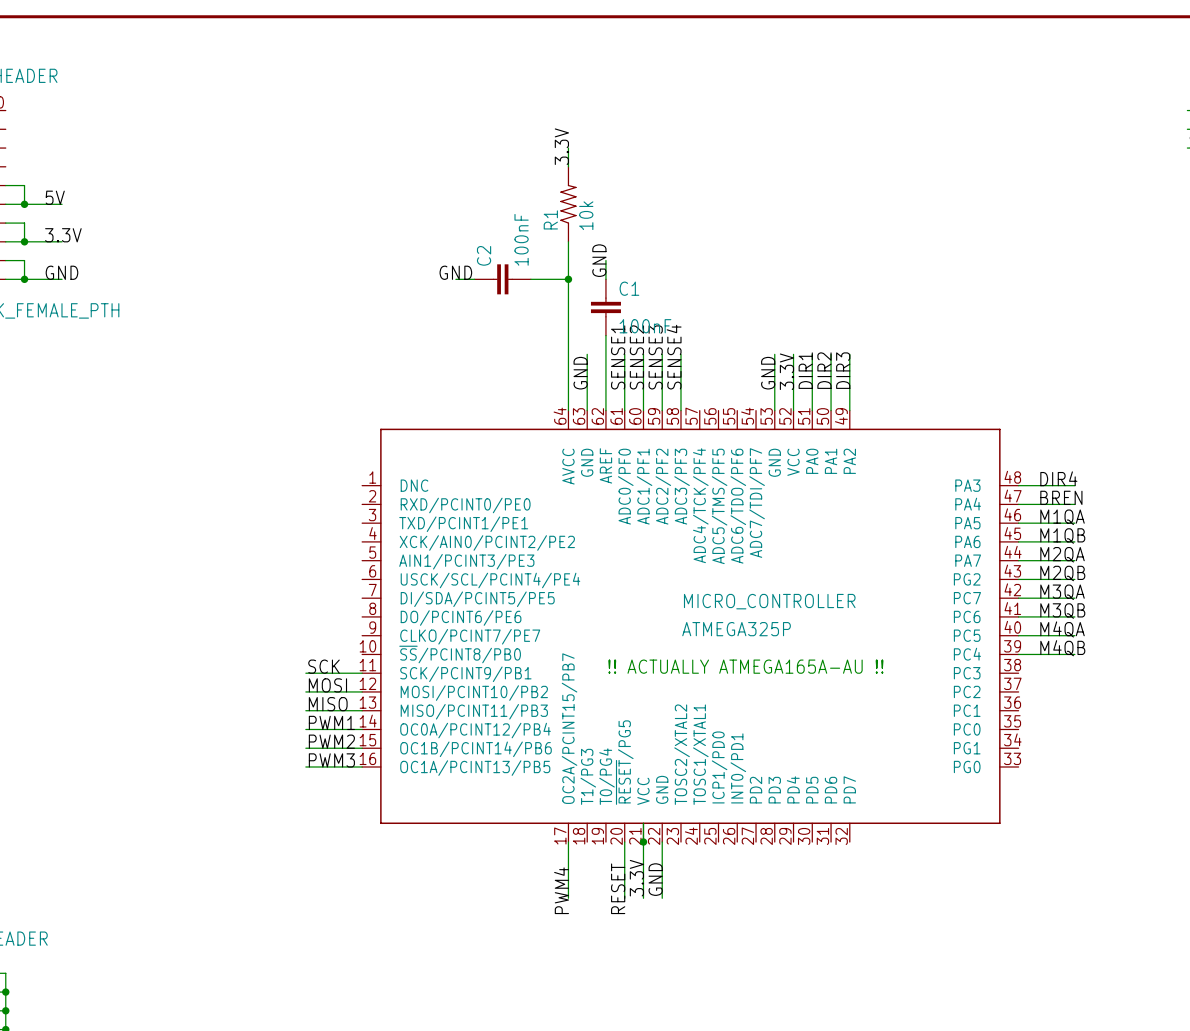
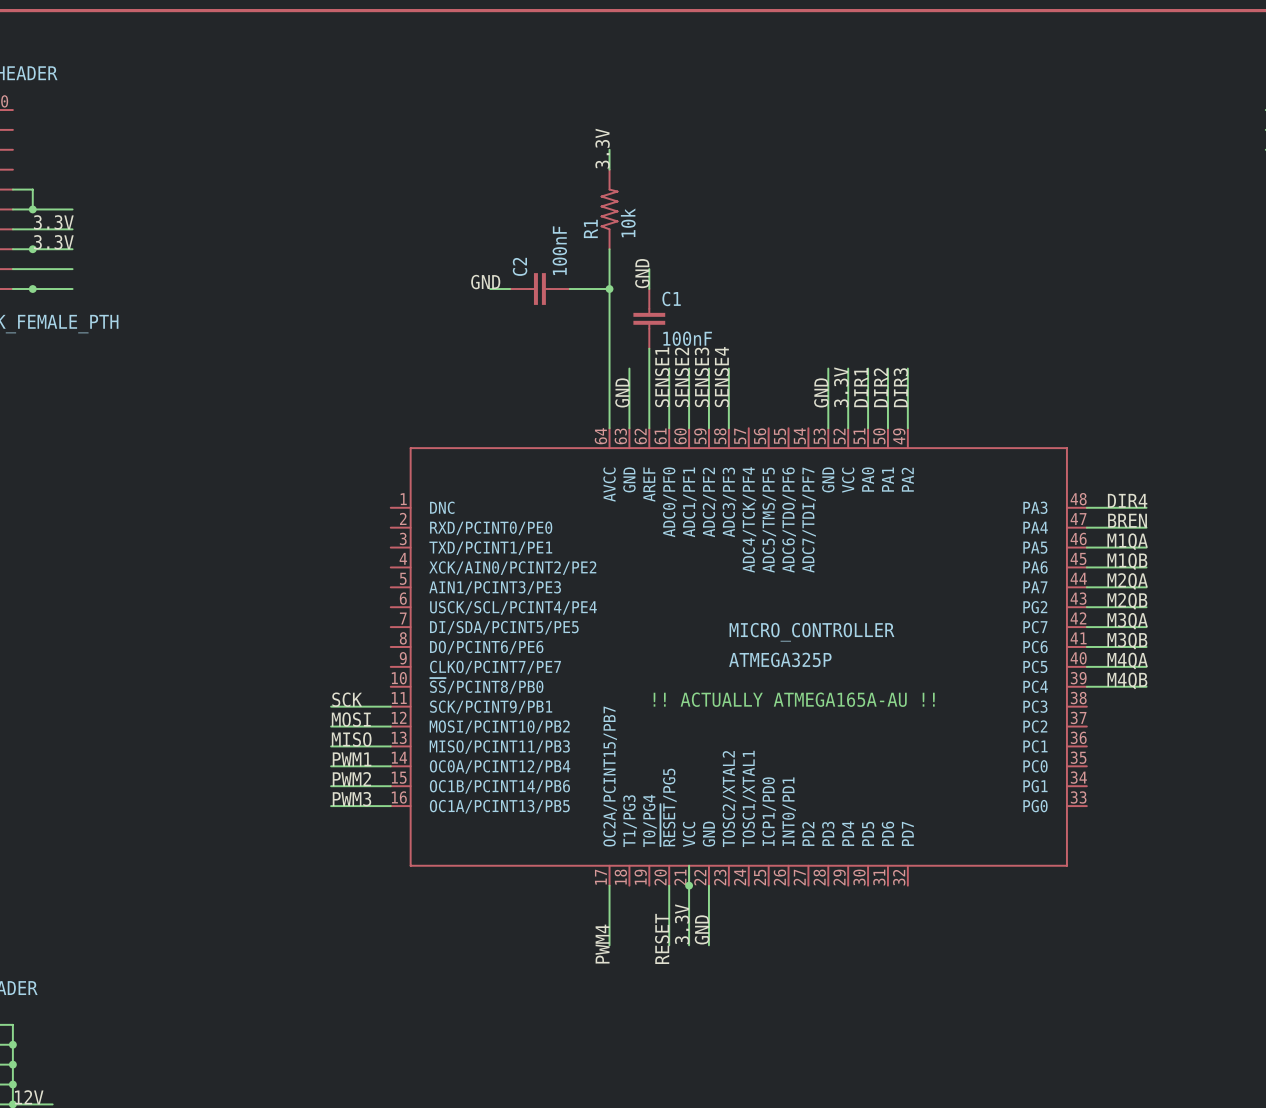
label: 5V (55, 197) -> none
label: none -> 3.3V (53, 222)
wire: (24, 223) (24, 241) -> (32, 229) (72, 229)
label: none -> 3.3V (53, 242)
label: 3.3V (63, 235) -> none
wire: (24, 260) (24, 279) -> (32, 269) (72, 269)
label: GND (61, 272) -> none

